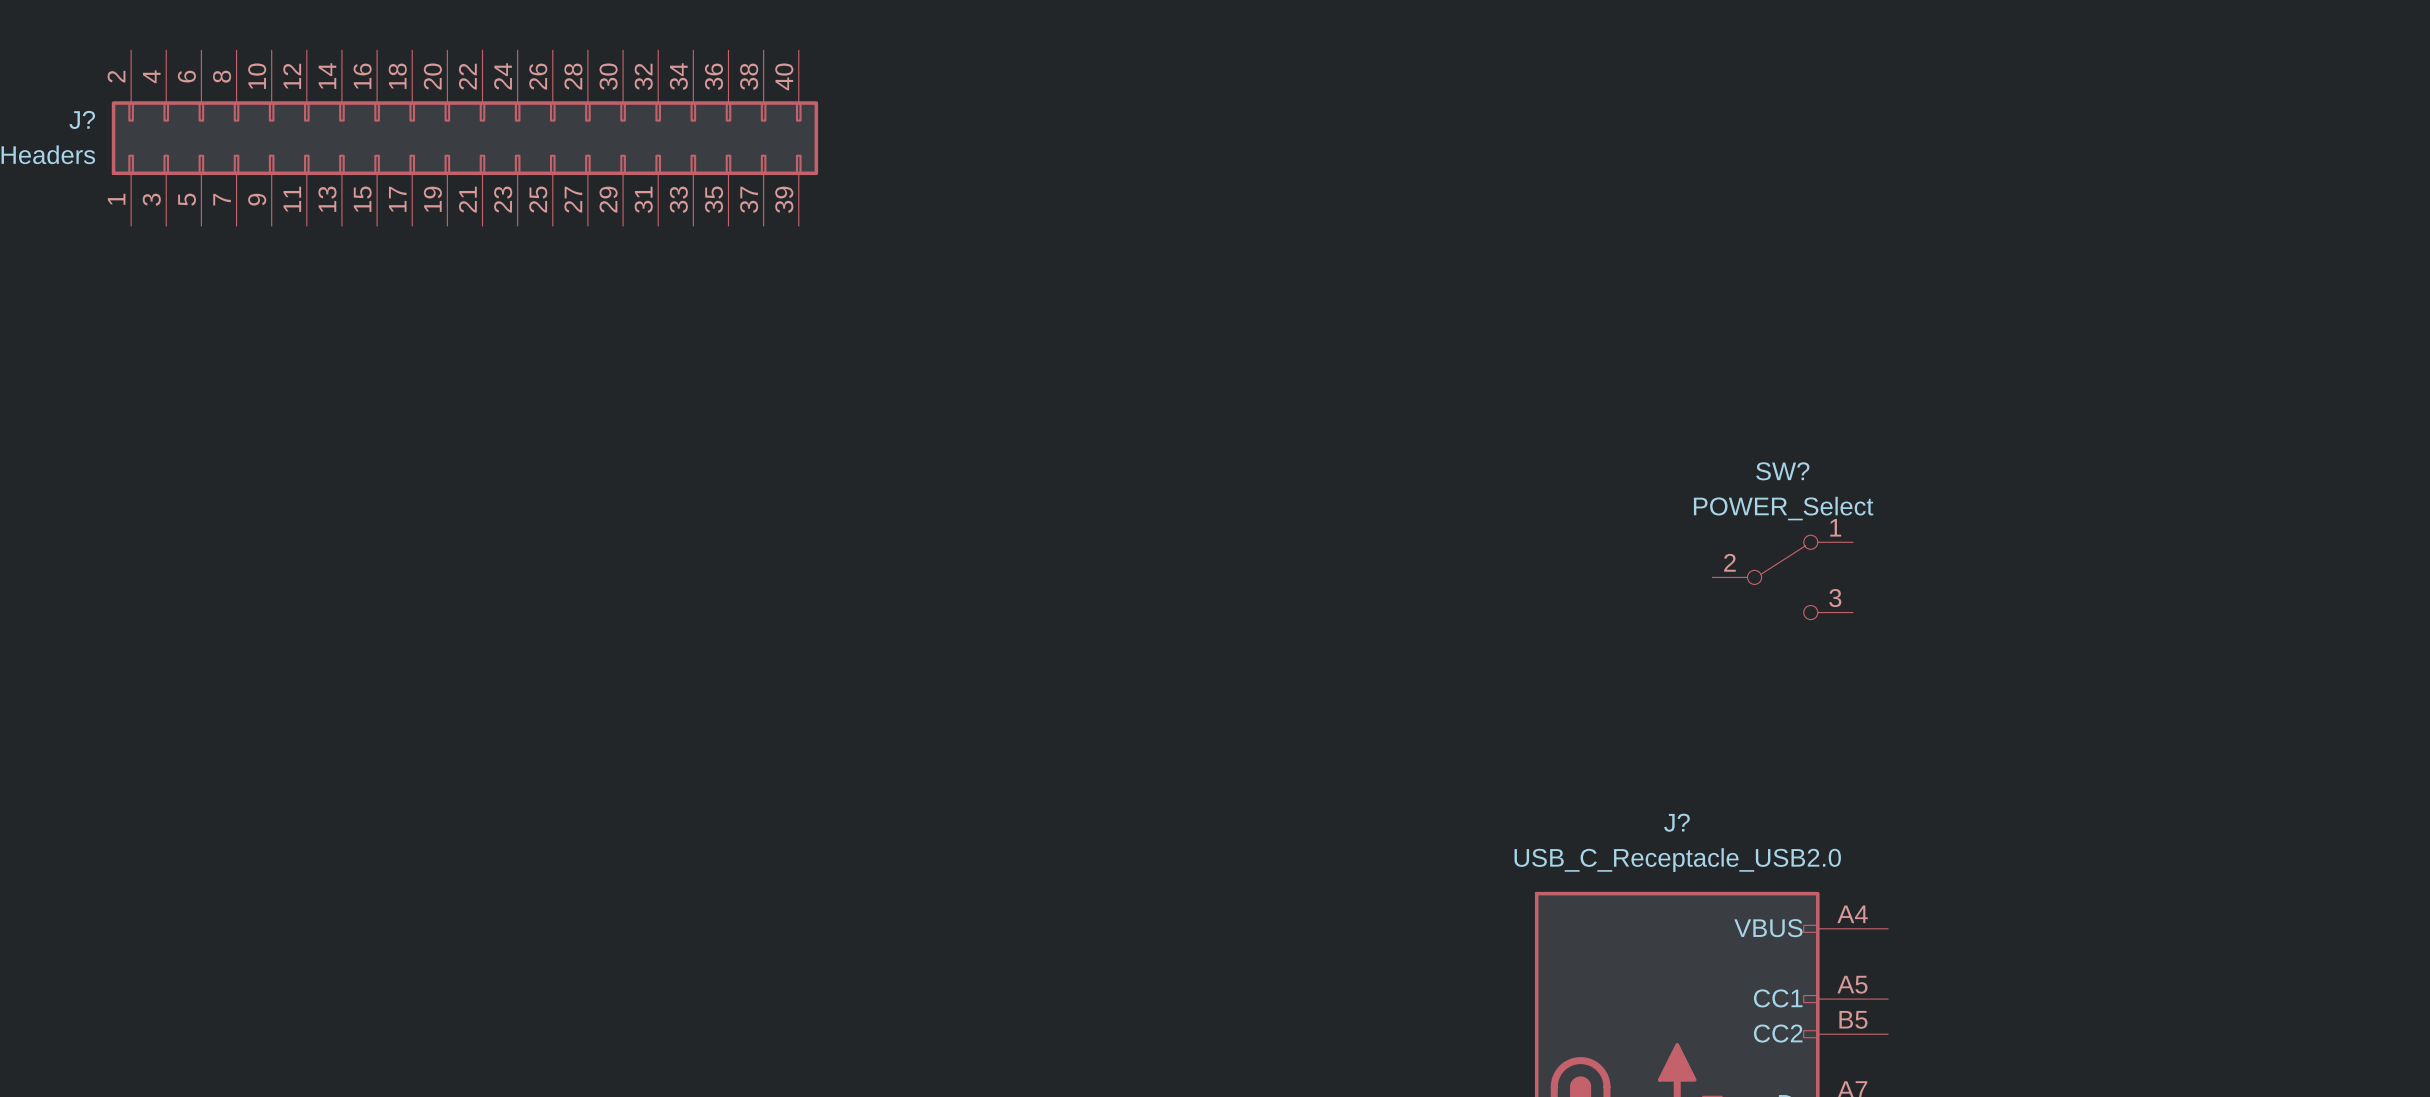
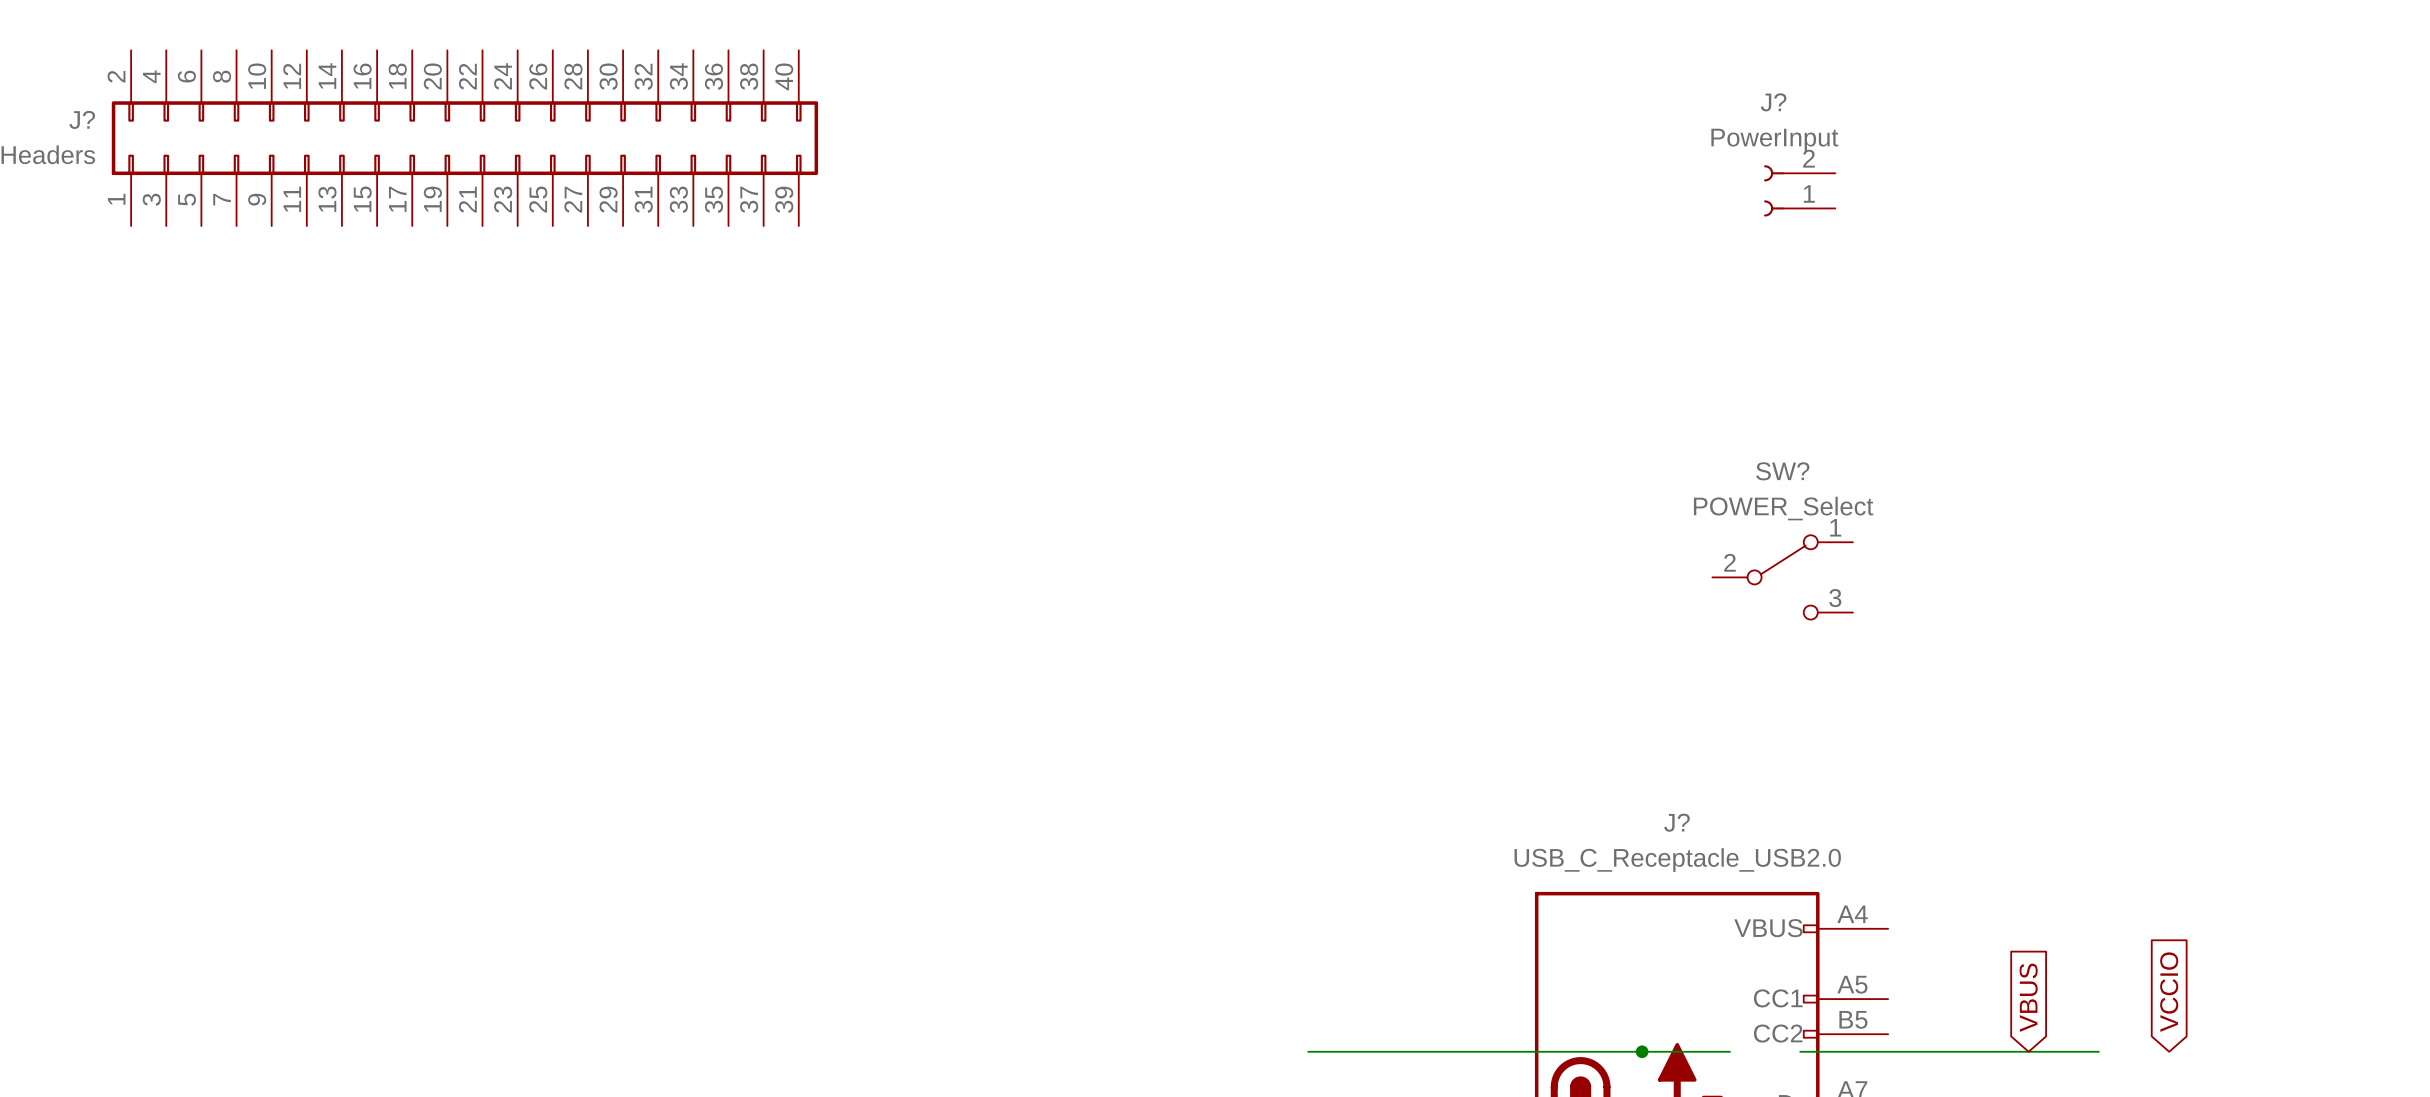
J?: none -> PowerInput (1799, 190)
global label: none -> VCCIO (2169, 992)
global label: none -> VBUS (2028, 997)
wire: none -> (1308, 1051) (1729, 1051)
junction: none -> (1642, 1051)
wire: none -> (1800, 1051) (2098, 1051)

